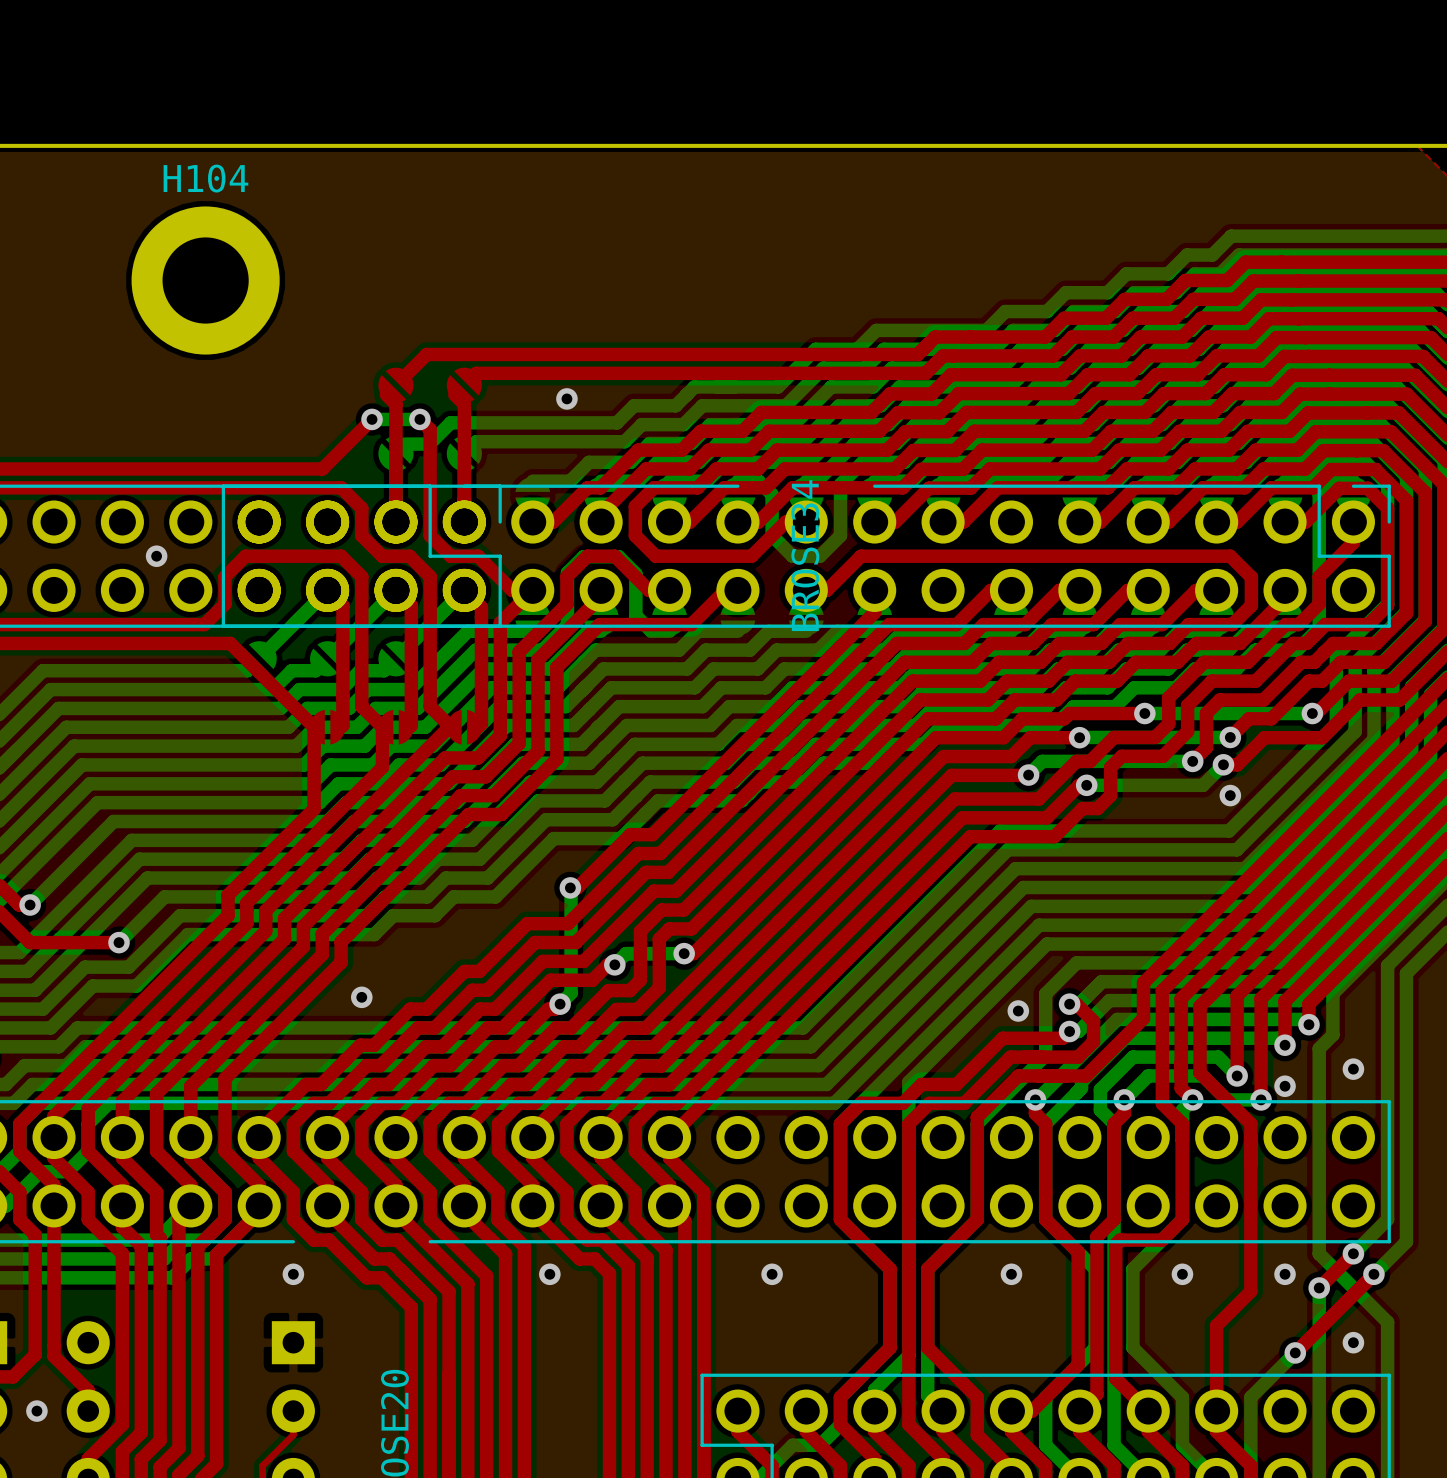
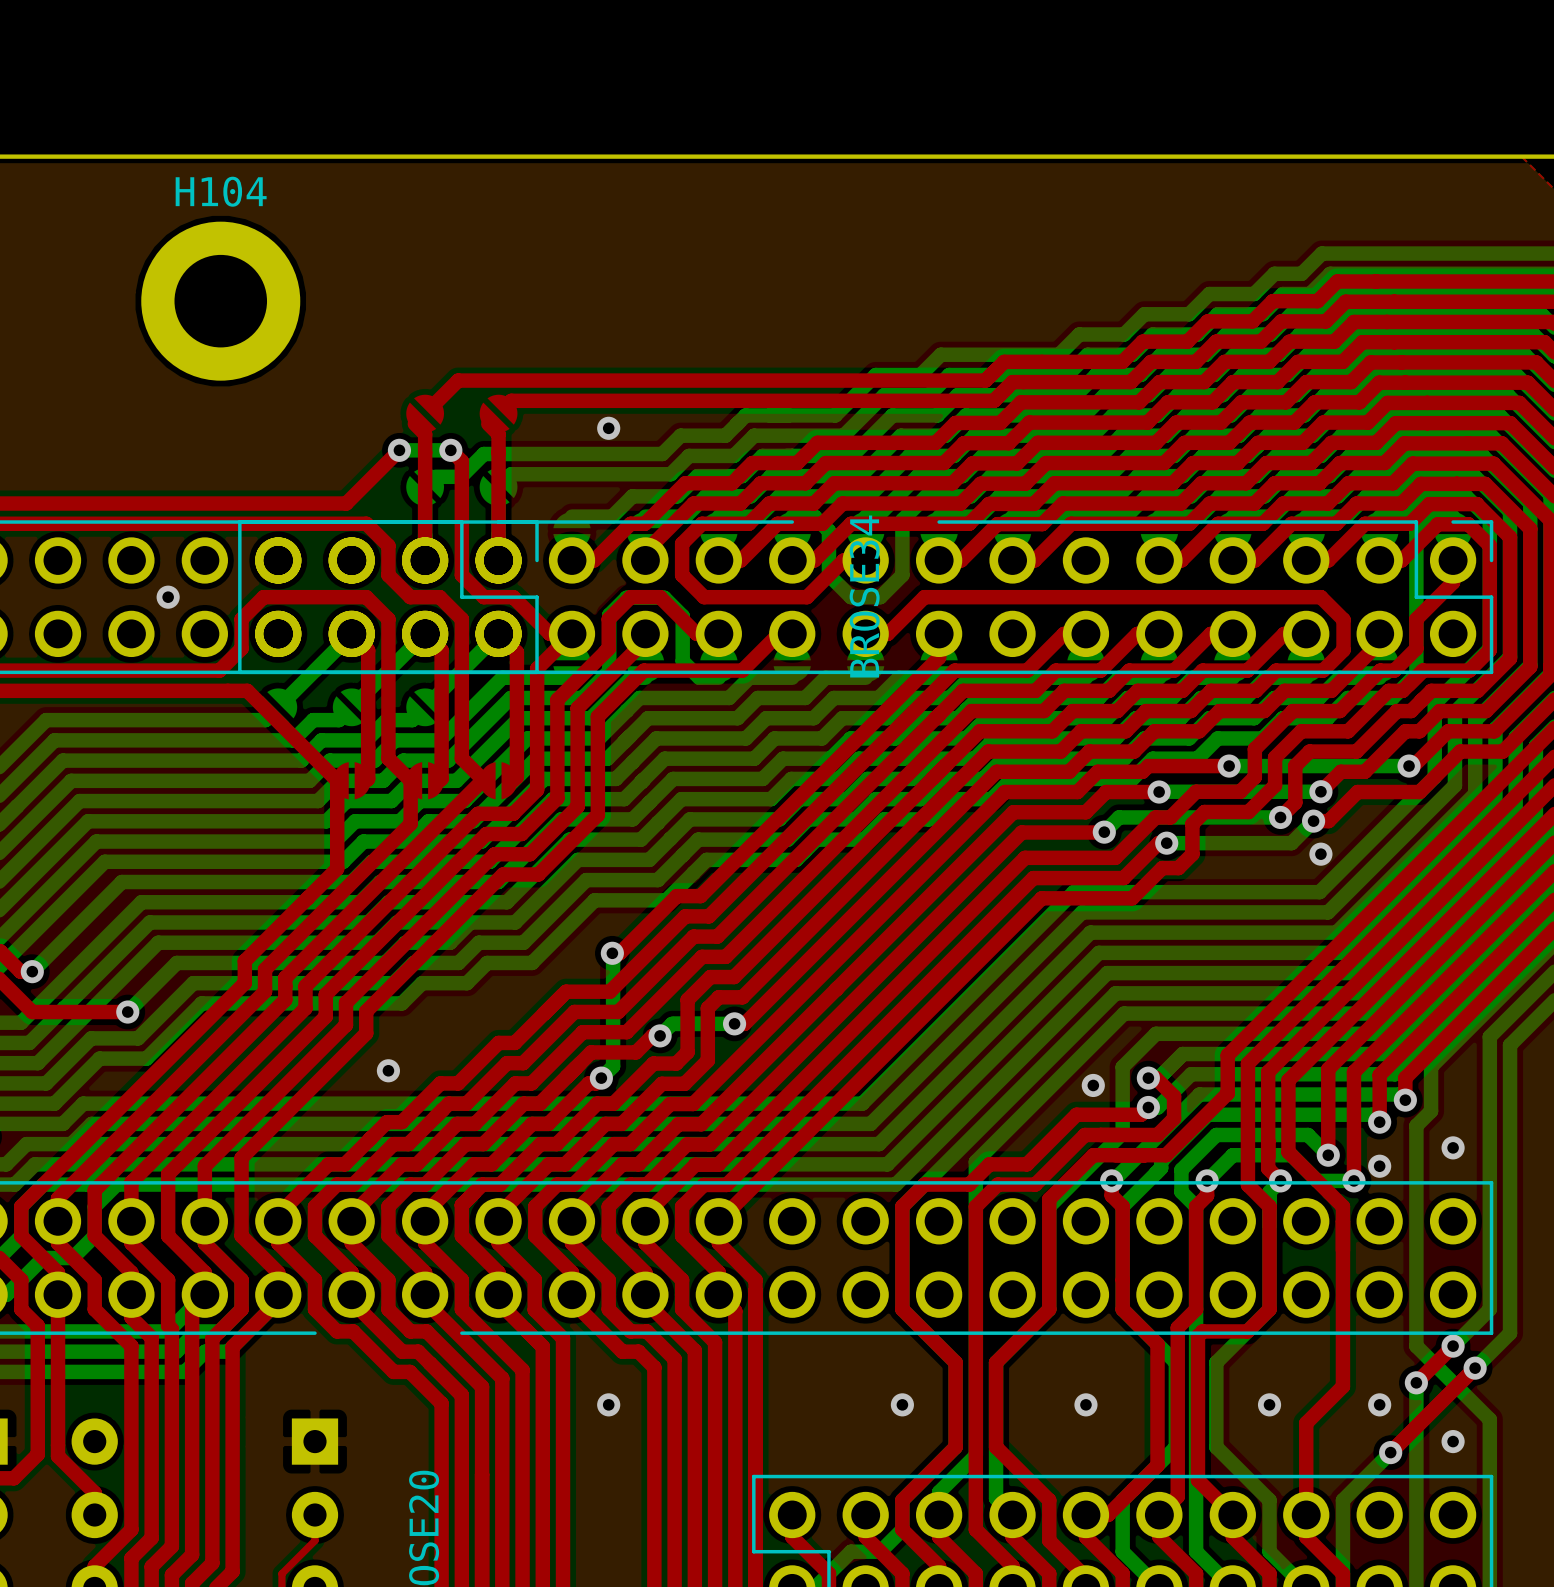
via: (293, 1274) -> none
via position: (549, 1274) -> (608, 1404)
via position: (772, 1274) -> (902, 1404)
via position: (1011, 1274) -> (1085, 1404)
via position: (1182, 1274) -> (1269, 1404)
via position: (1285, 1274) -> (1379, 1404)
via: (36, 1411) -> none

